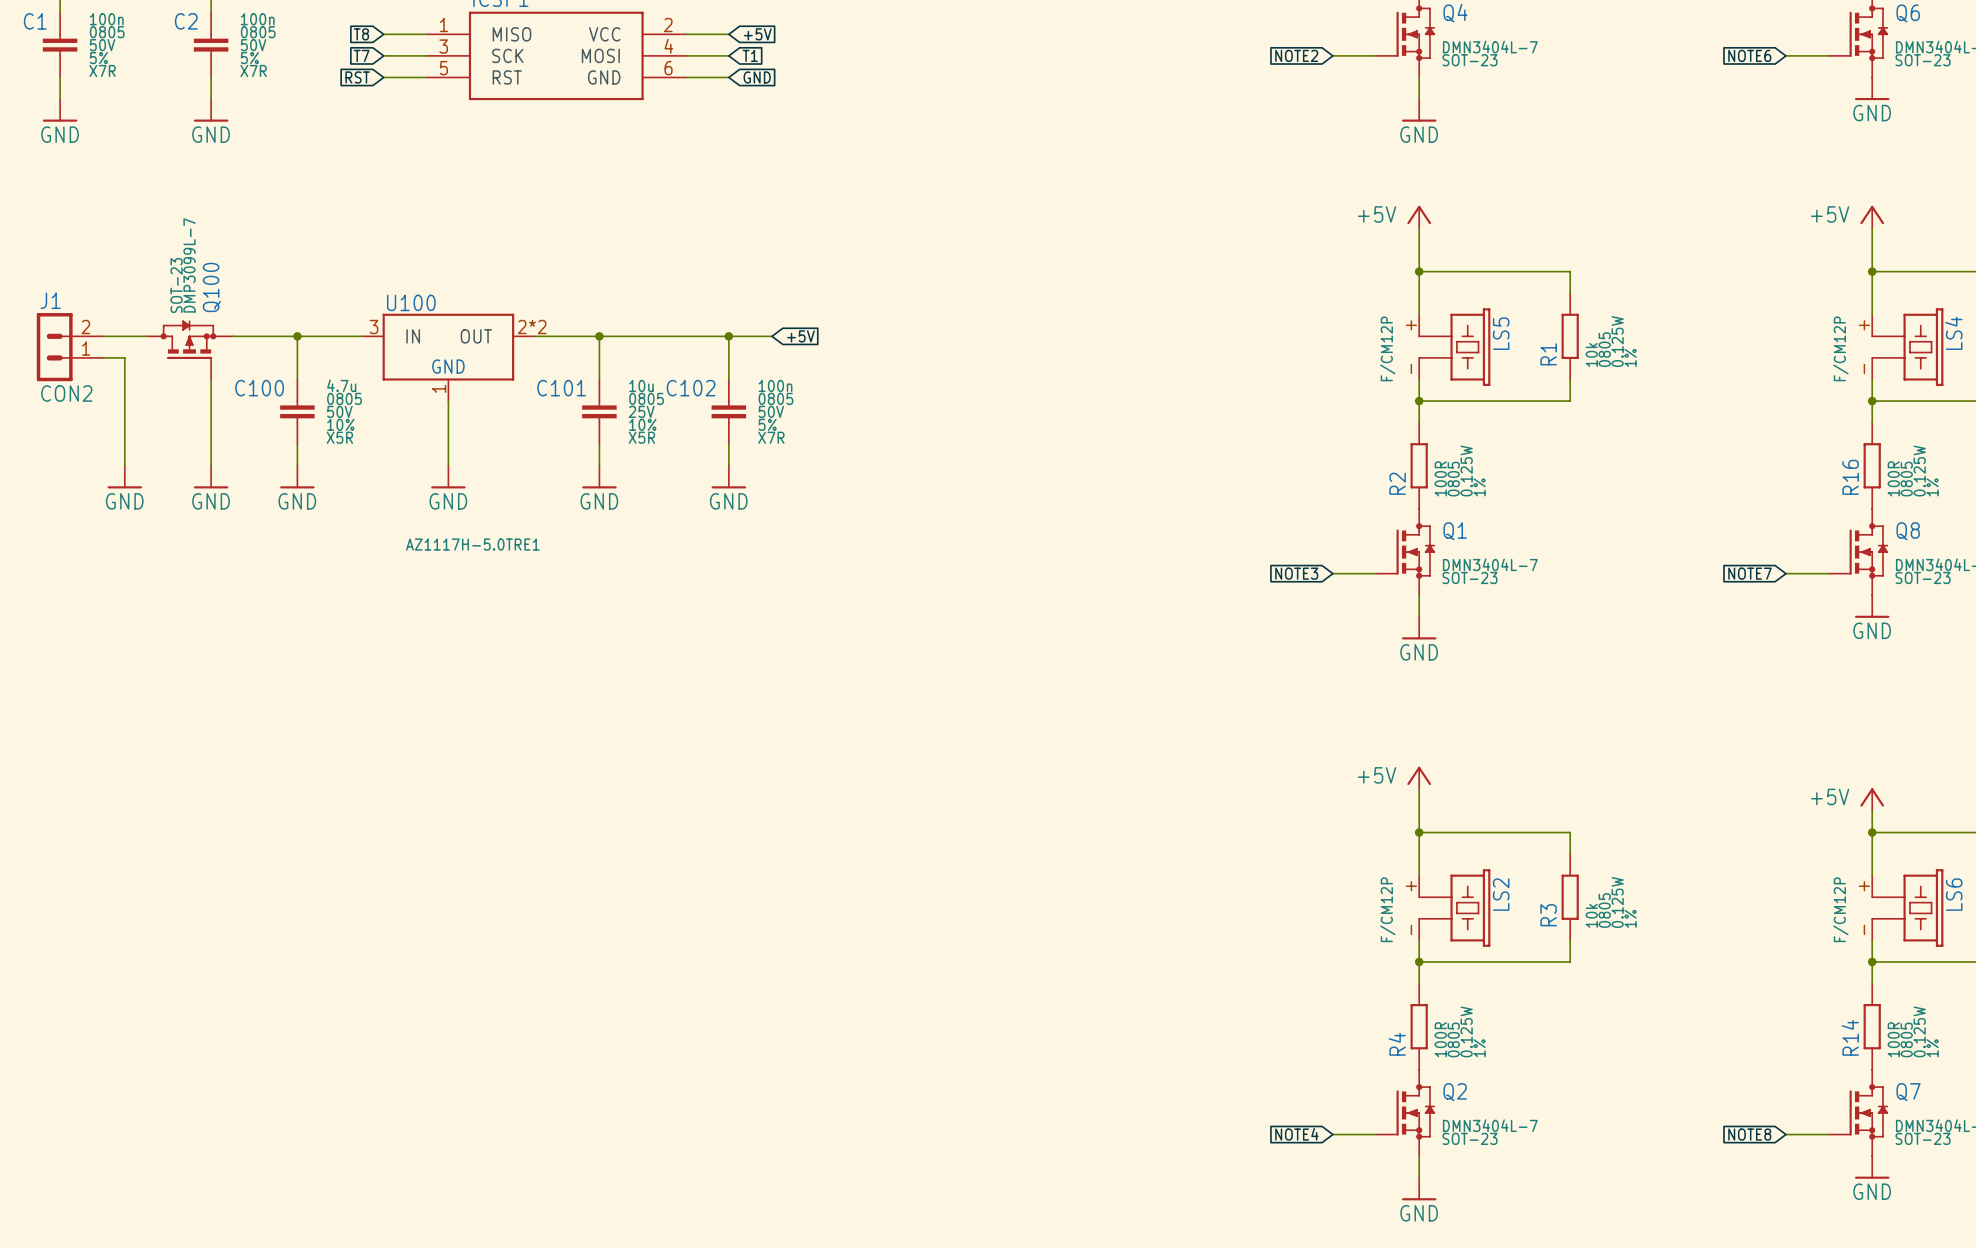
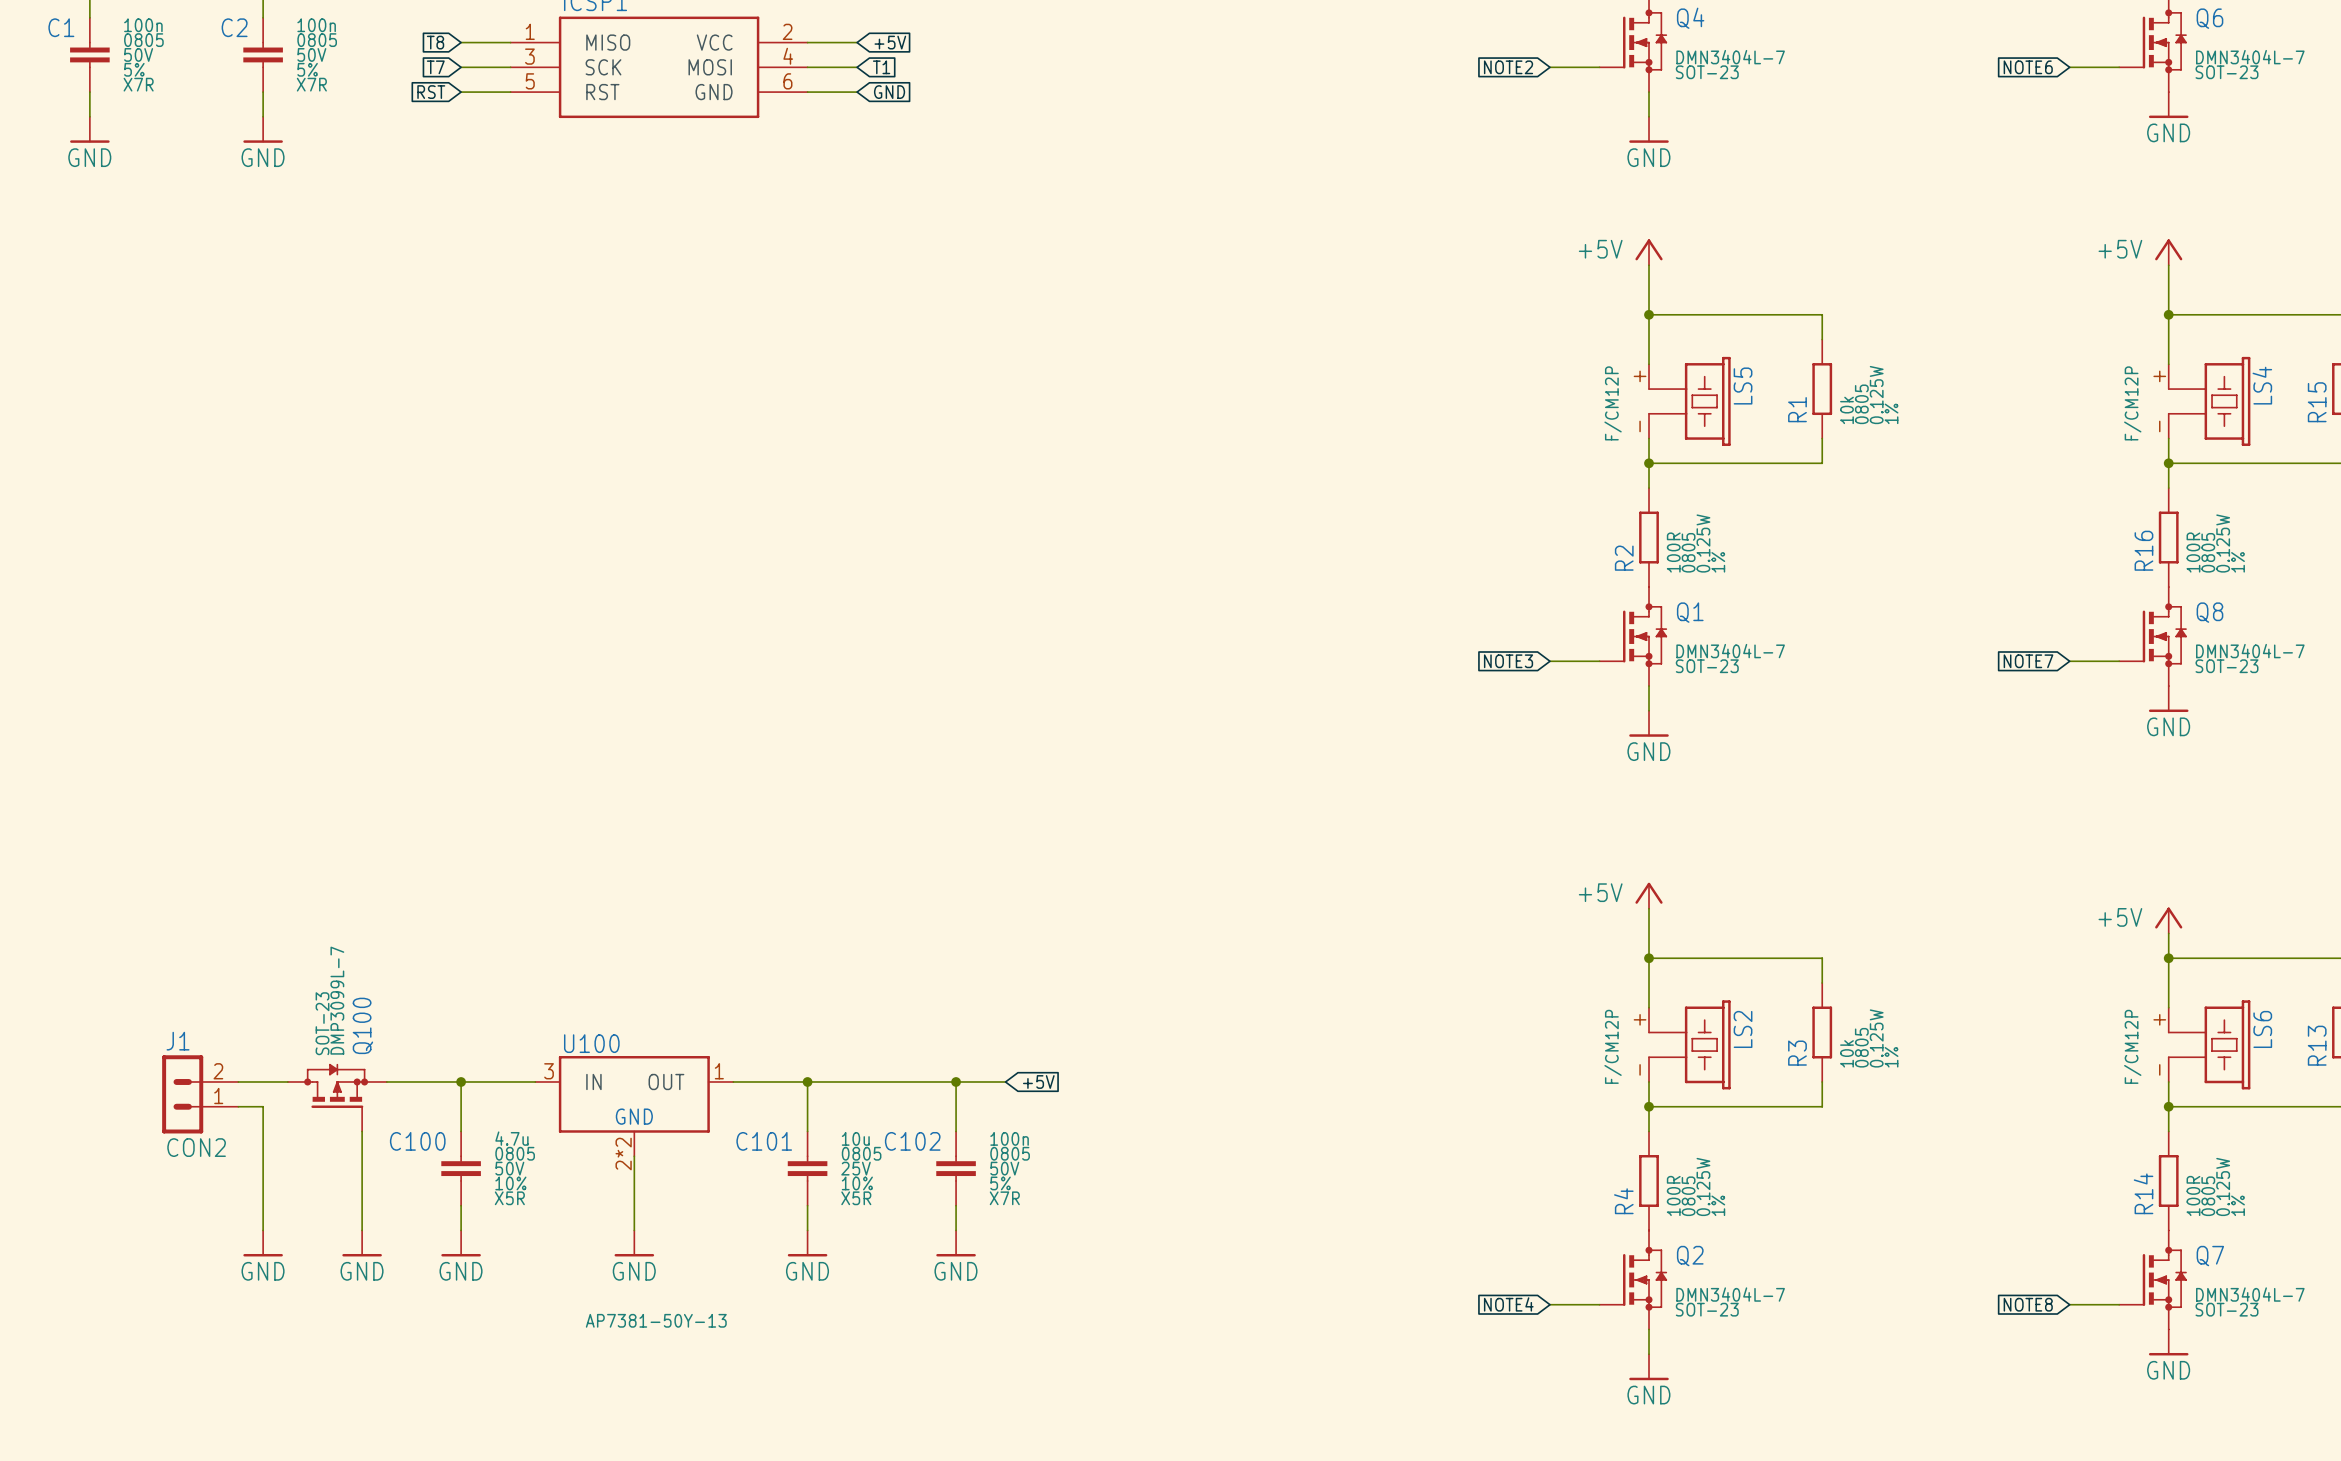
U100 pin number: 2*2 (532, 327) -> 1 (719, 1071)
wire: (103, 336) (146, 336) -> none
wire: (232, 336) (362, 336) -> none
wire: (297, 336) (297, 379) -> none
junction: (297, 336) -> none
wire: (534, 336) (772, 336) -> none
wire: (599, 336) (599, 379) -> none
junction: (599, 336) -> none
wire: (728, 336) (728, 379) -> none
junction: (728, 336) -> none
global label: +5V (800, 336) -> none
J1 position: (70, 347) -> (200, 1094)
Q100 position: (189, 350) -> (337, 1097)
wire: (103, 357) (124, 357) (124, 465) -> none
U100 position: (448, 357) -> (634, 1106)
wire: (211, 379) (211, 465) -> none
U100 pin number: 1 (439, 388) -> 2*2 (623, 1154)
wire: (448, 401) (448, 465) -> none
C100 position: (297, 411) -> (461, 1168)
C101 position: (599, 411) -> (807, 1168)
C102 position: (728, 411) -> (956, 1168)
wire: (297, 444) (297, 465) -> none
wire: (599, 444) (599, 465) -> none
wire: (728, 444) (728, 465) -> none
power symbol: GND (124, 477) -> none
power symbol: GND (211, 477) -> none
power symbol: GND (297, 477) -> none
power symbol: GND (448, 477) -> none
power symbol: GND (599, 477) -> none
power symbol: GND (728, 477) -> none
U100 value: AZ1117H-5.0TRE1 (472, 544) -> AP7381-50Y-13 (656, 1320)
wire: none -> (238, 1081) (287, 1081)
wire: none -> (386, 1081) (535, 1081)
wire: none -> (461, 1081) (461, 1131)
junction: none -> (461, 1081)
wire: none -> (733, 1081) (1005, 1081)
wire: none -> (807, 1081) (807, 1131)
junction: none -> (807, 1081)
wire: none -> (956, 1081) (956, 1131)
junction: none -> (956, 1081)
global label: none -> +5V (1038, 1081)
wire: none -> (238, 1106) (263, 1106) (263, 1230)
wire: none -> (362, 1131) (362, 1230)
wire: none -> (634, 1156) (634, 1230)
wire: none -> (461, 1205) (461, 1230)
wire: none -> (807, 1205) (807, 1230)
wire: none -> (956, 1205) (956, 1230)
power symbol: none -> GND (263, 1243)
power symbol: none -> GND (362, 1243)
power symbol: none -> GND (461, 1243)
power symbol: none -> GND (634, 1243)
power symbol: none -> GND (807, 1243)
power symbol: none -> GND (956, 1243)

